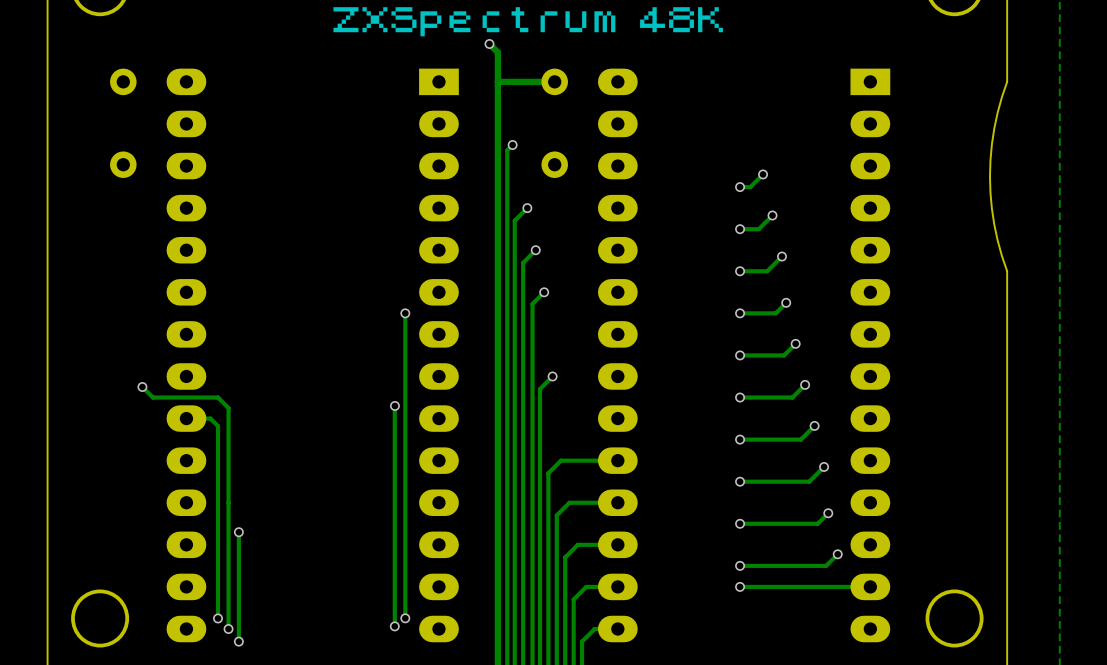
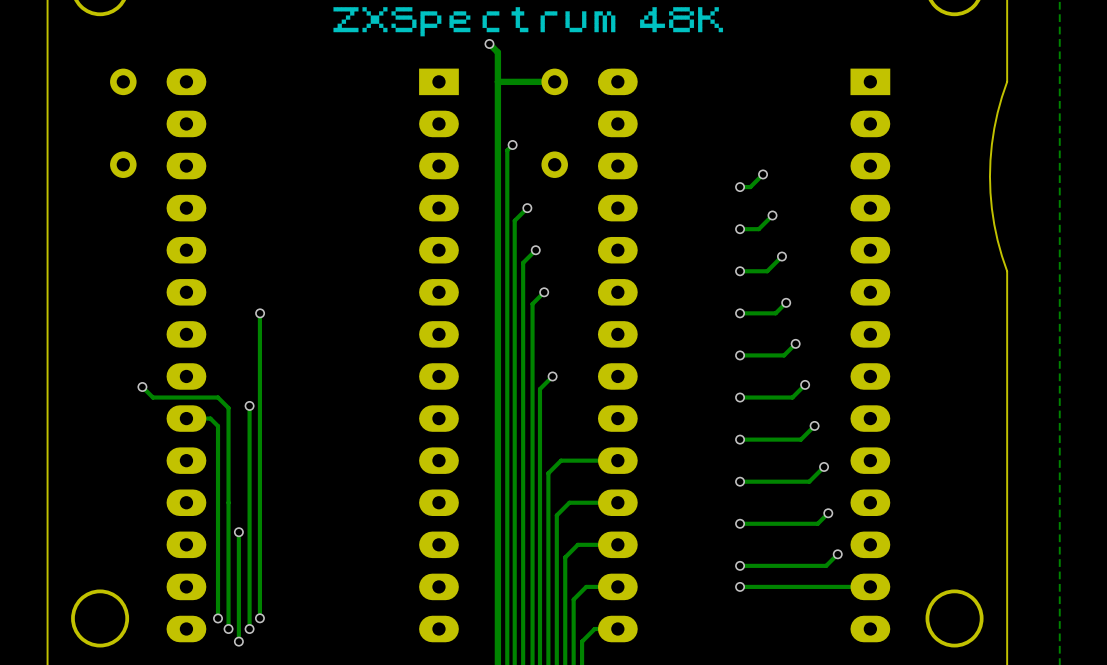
via: none -> (260, 313)
track: (405, 313) (405, 618) -> (259, 313) (259, 618)
via: (405, 313) -> none
track: none -> (249, 405) (249, 629)
via: none -> (249, 405)
via: (394, 405) -> none
track: (394, 406) (394, 626) -> none
via: none -> (259, 618)
via: (405, 618) -> none
via: (394, 626) -> none
via: none -> (249, 629)

